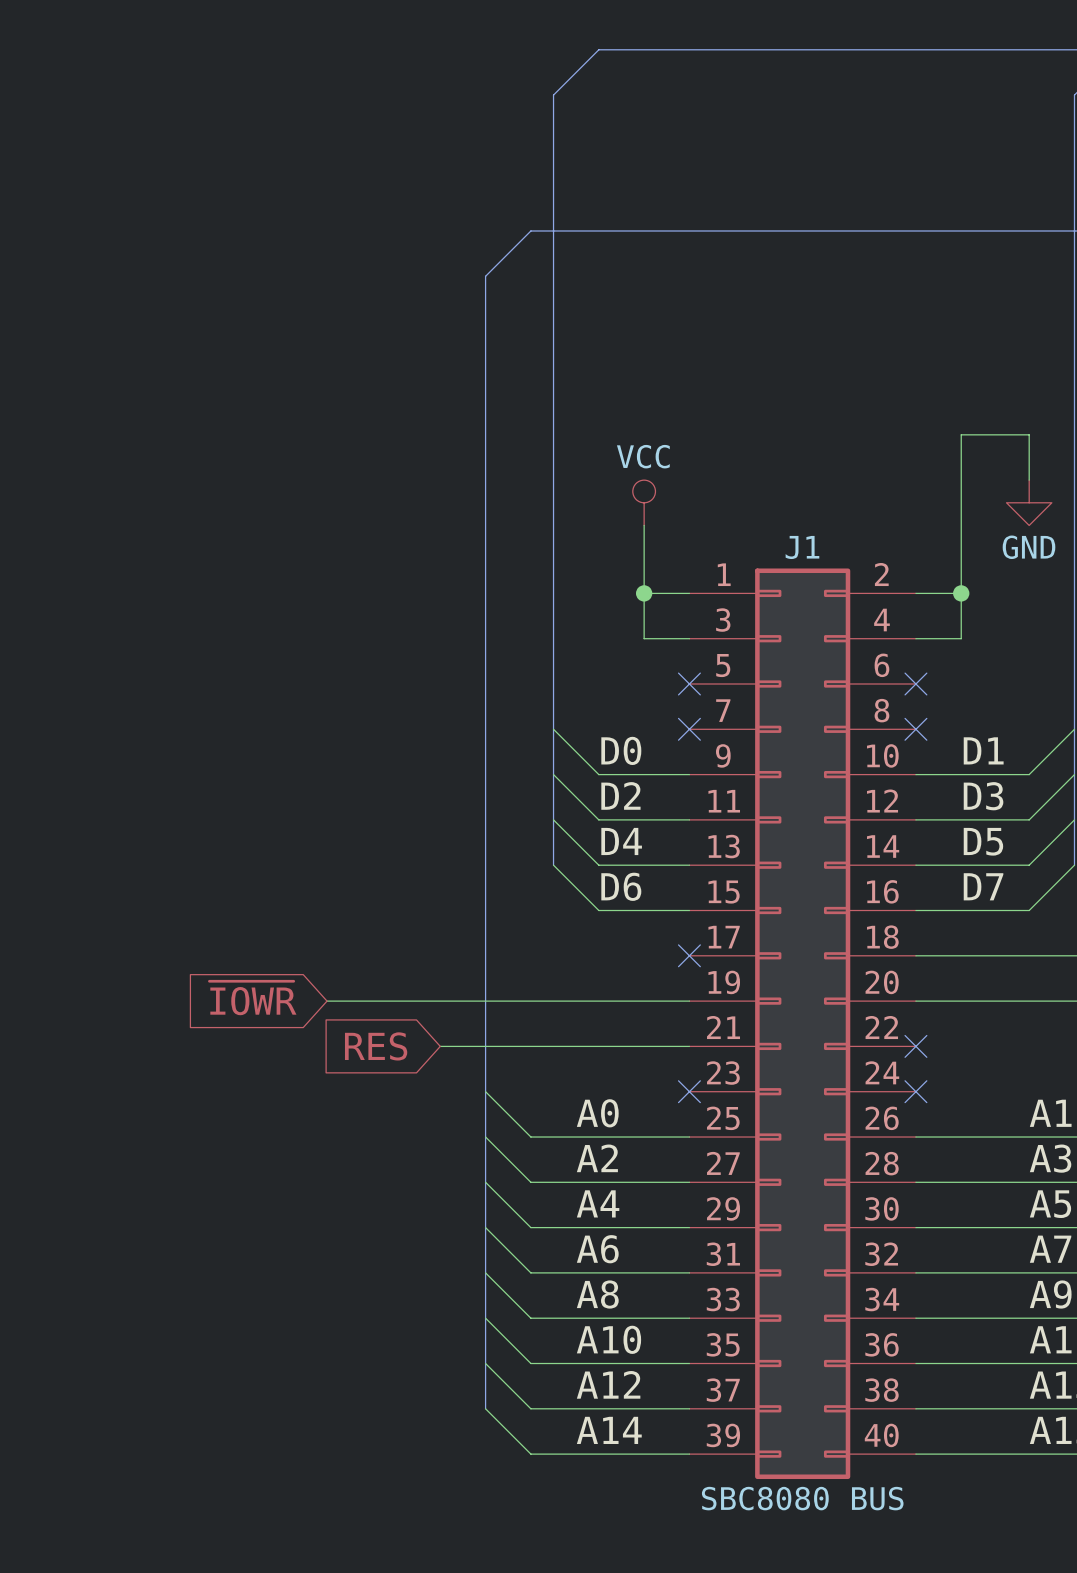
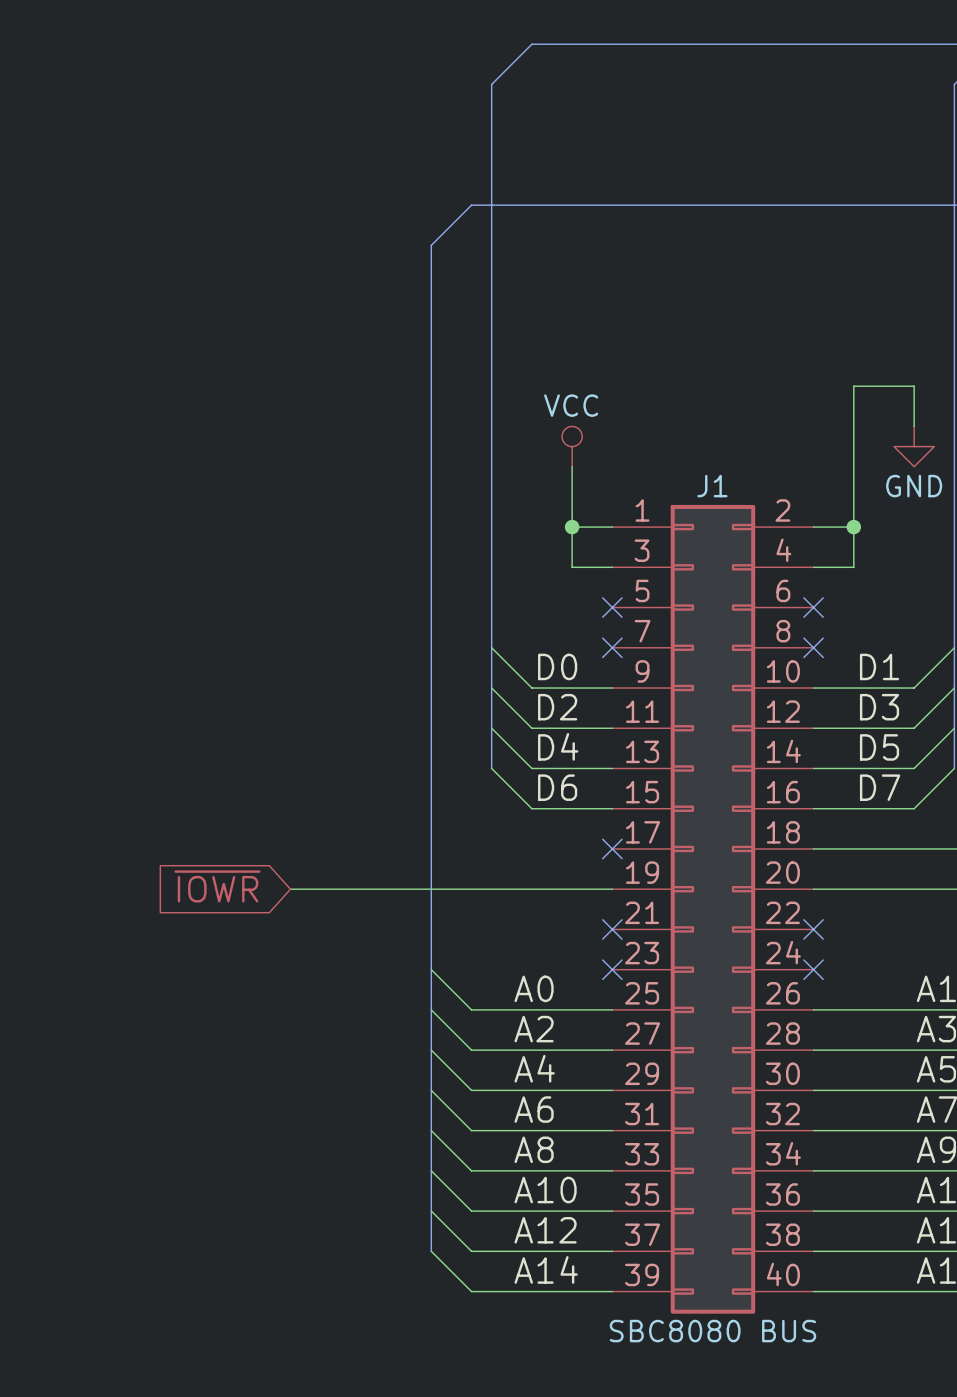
global label: RES (376, 1046) -> none
wire: (440, 1046) (689, 1046) -> none
no-connect mark: none -> (612, 929)

